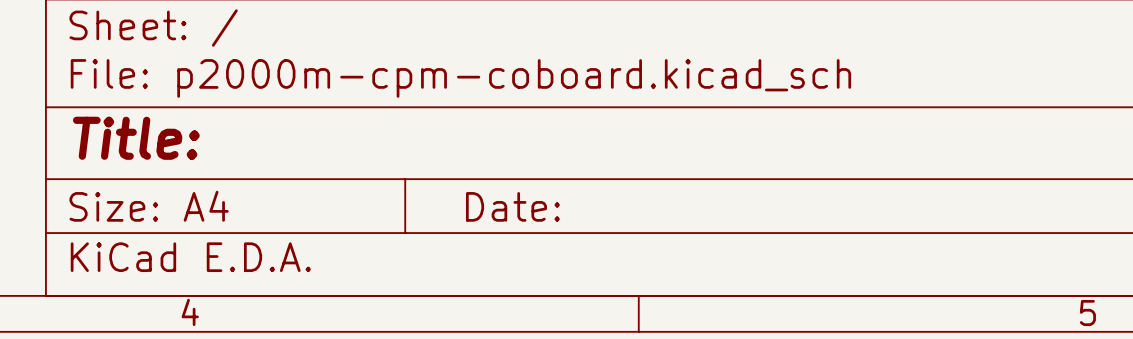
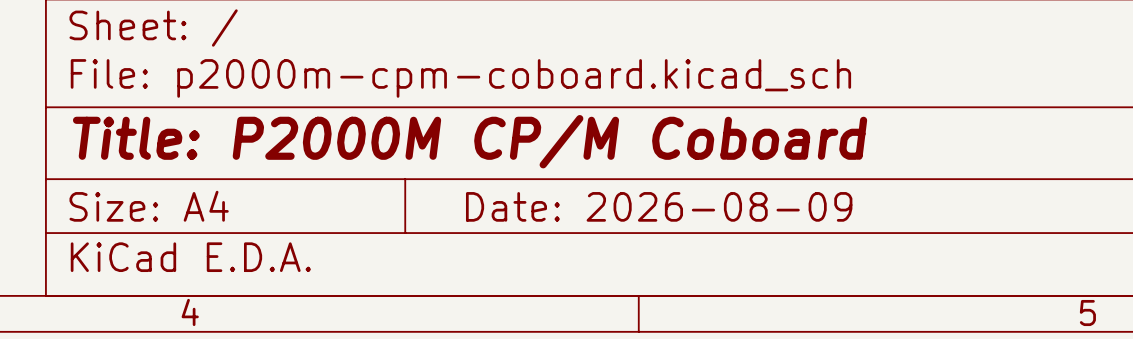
title block: Title: (136, 138) -> Title: P2000M CP/M Coboard (470, 141)
title block: Date: (512, 206) -> Date: 2026-08-09 (659, 206)

